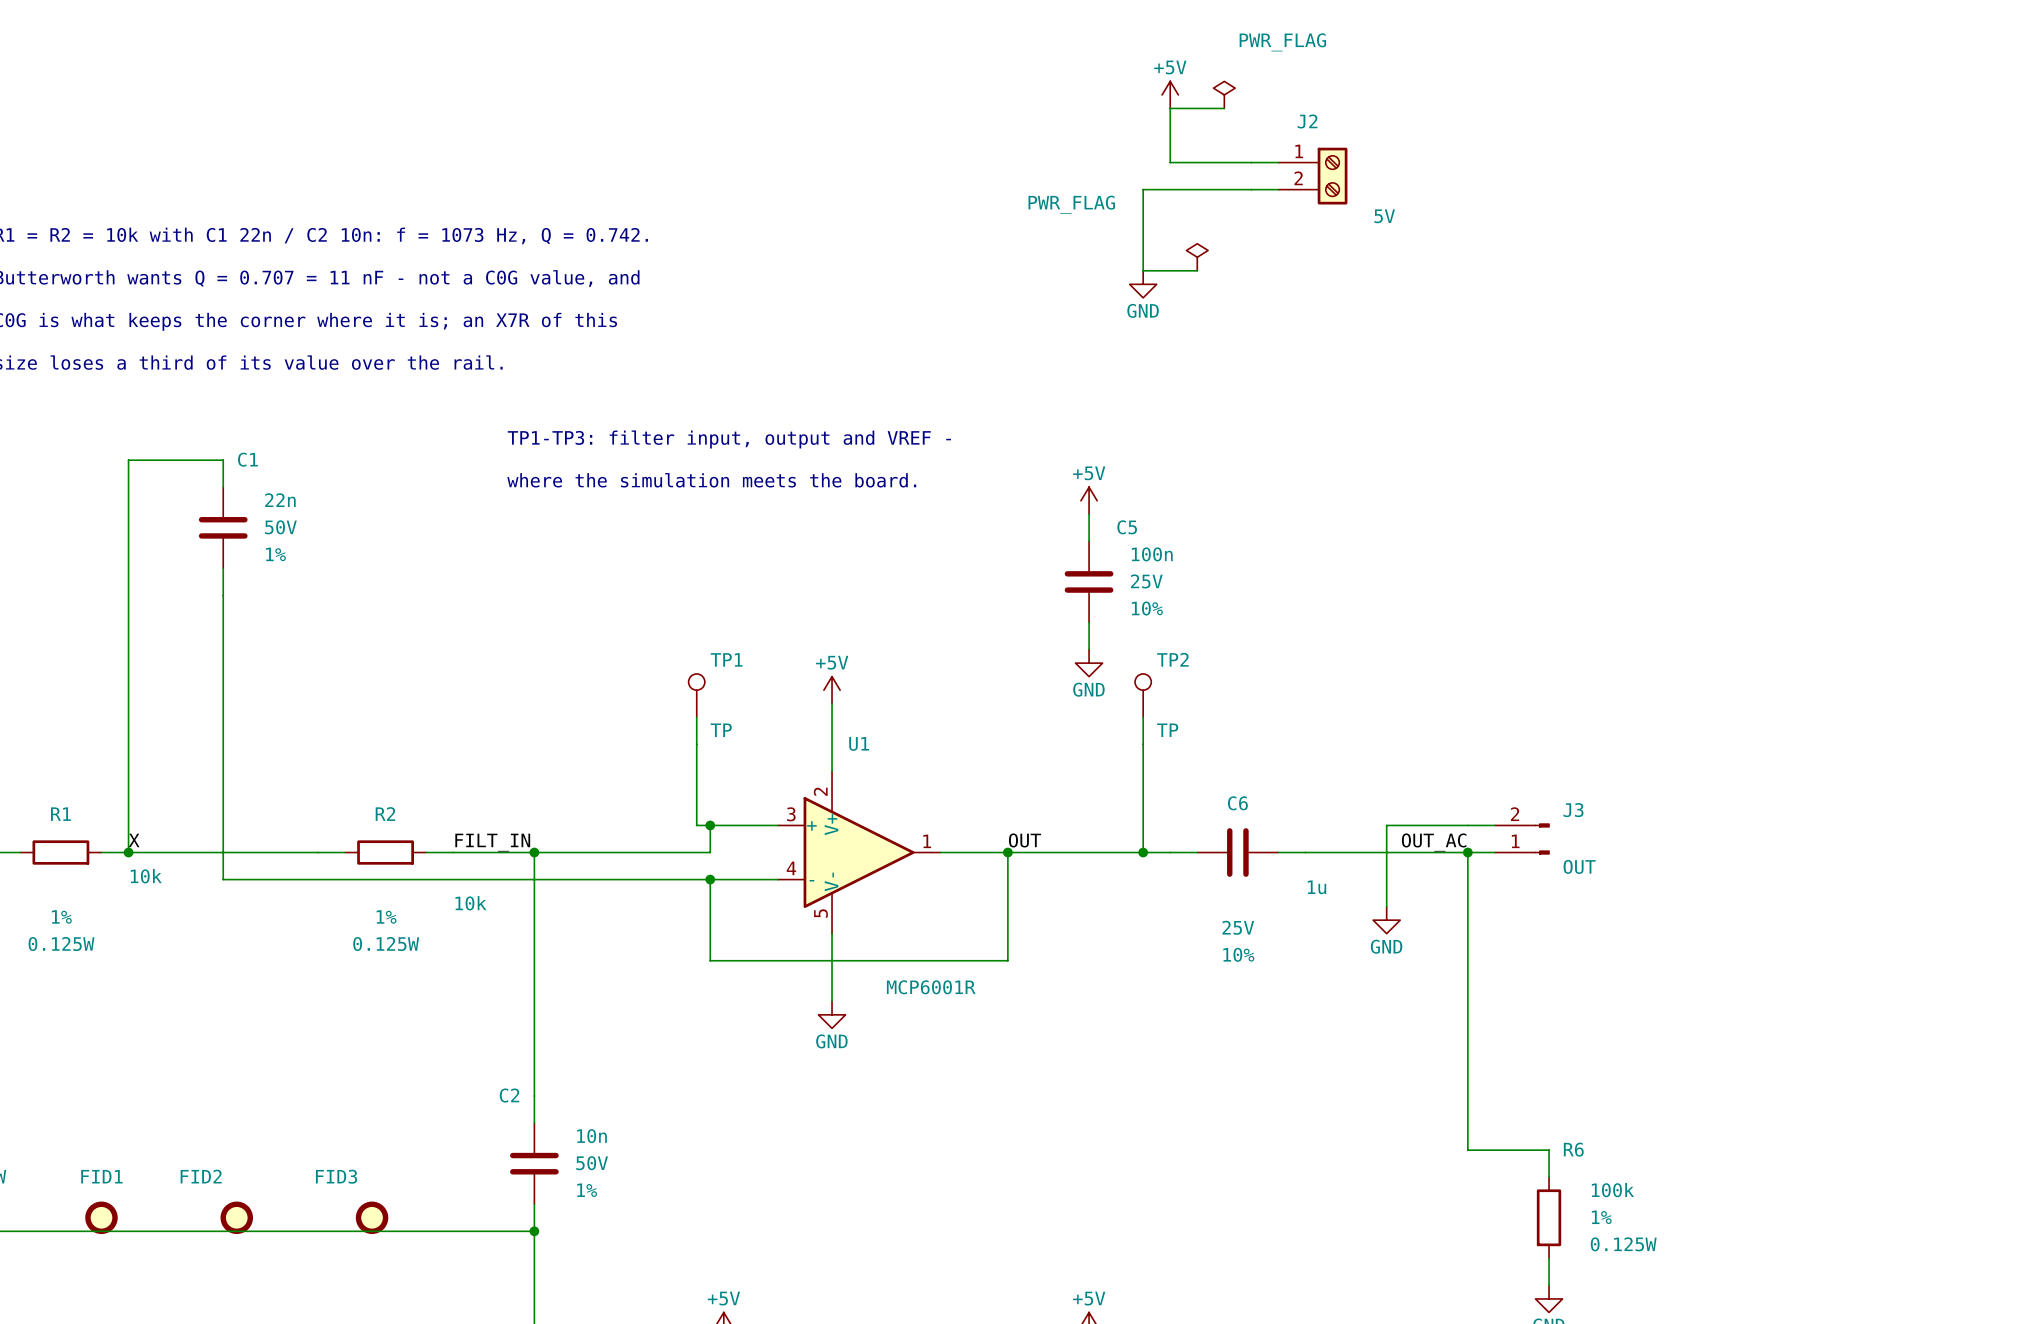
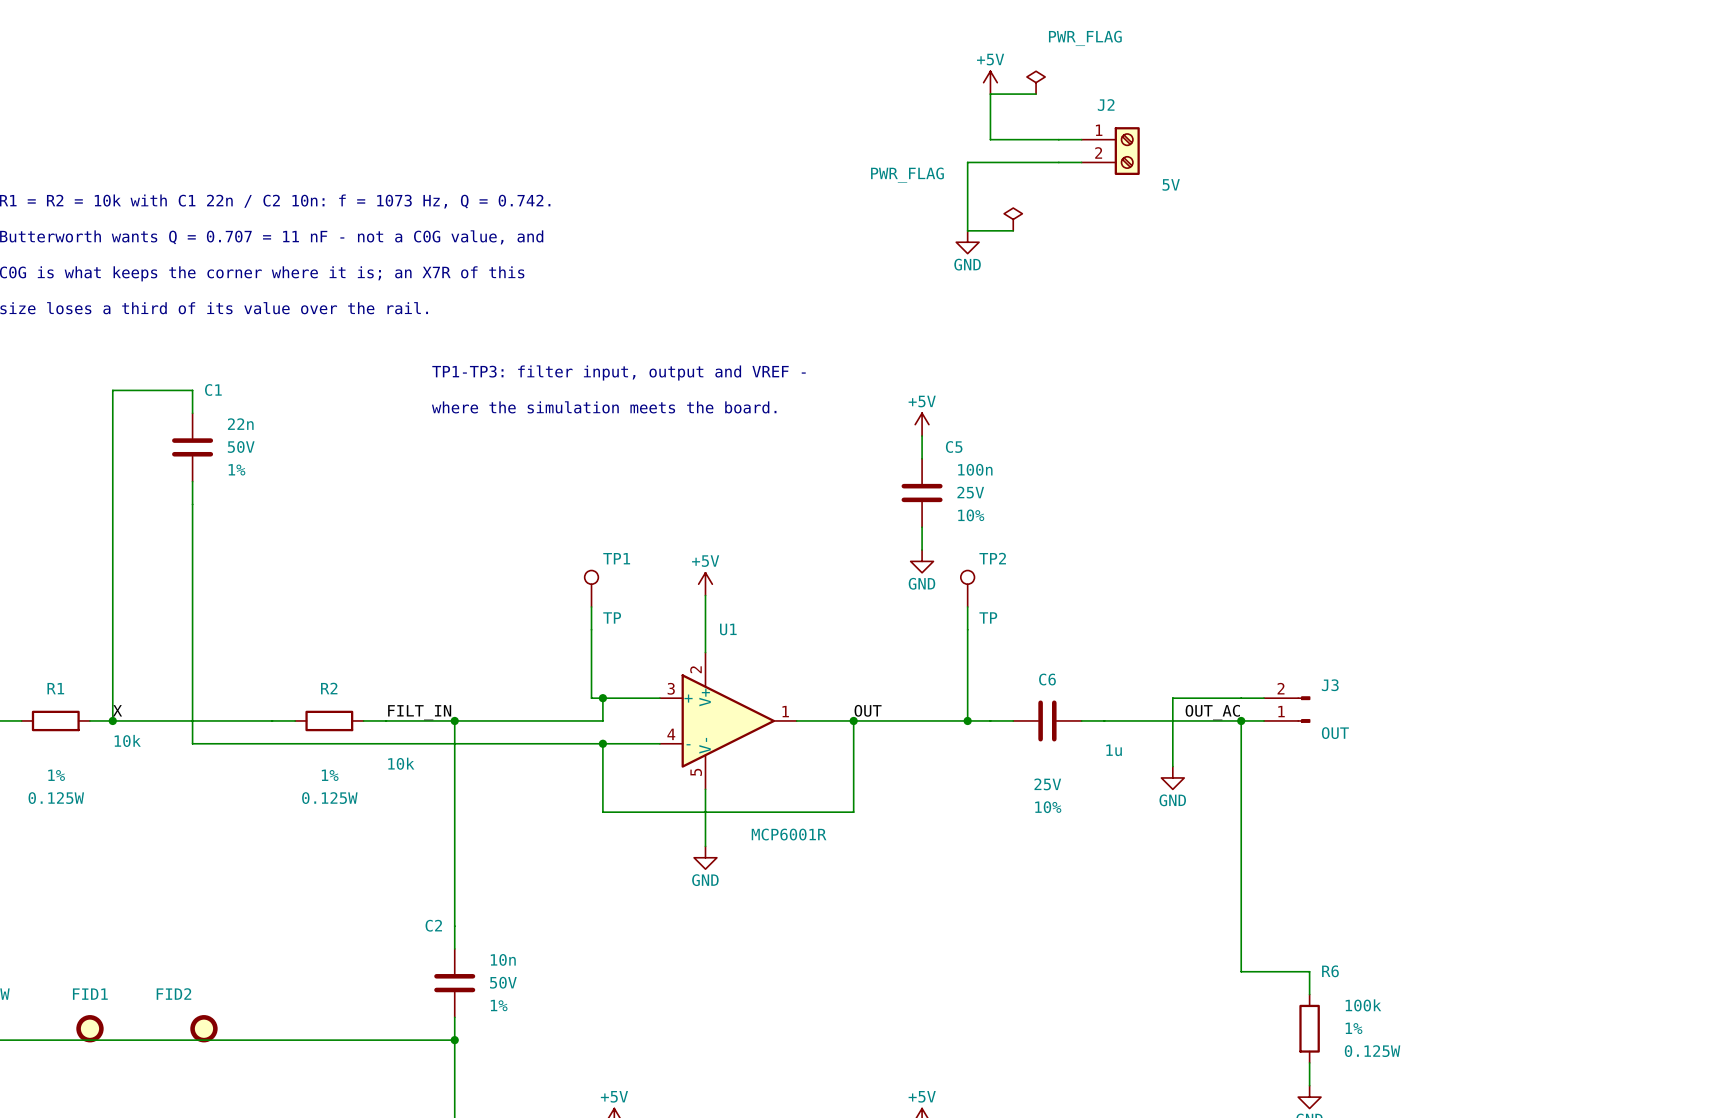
FID3: (372, 1217) -> none

